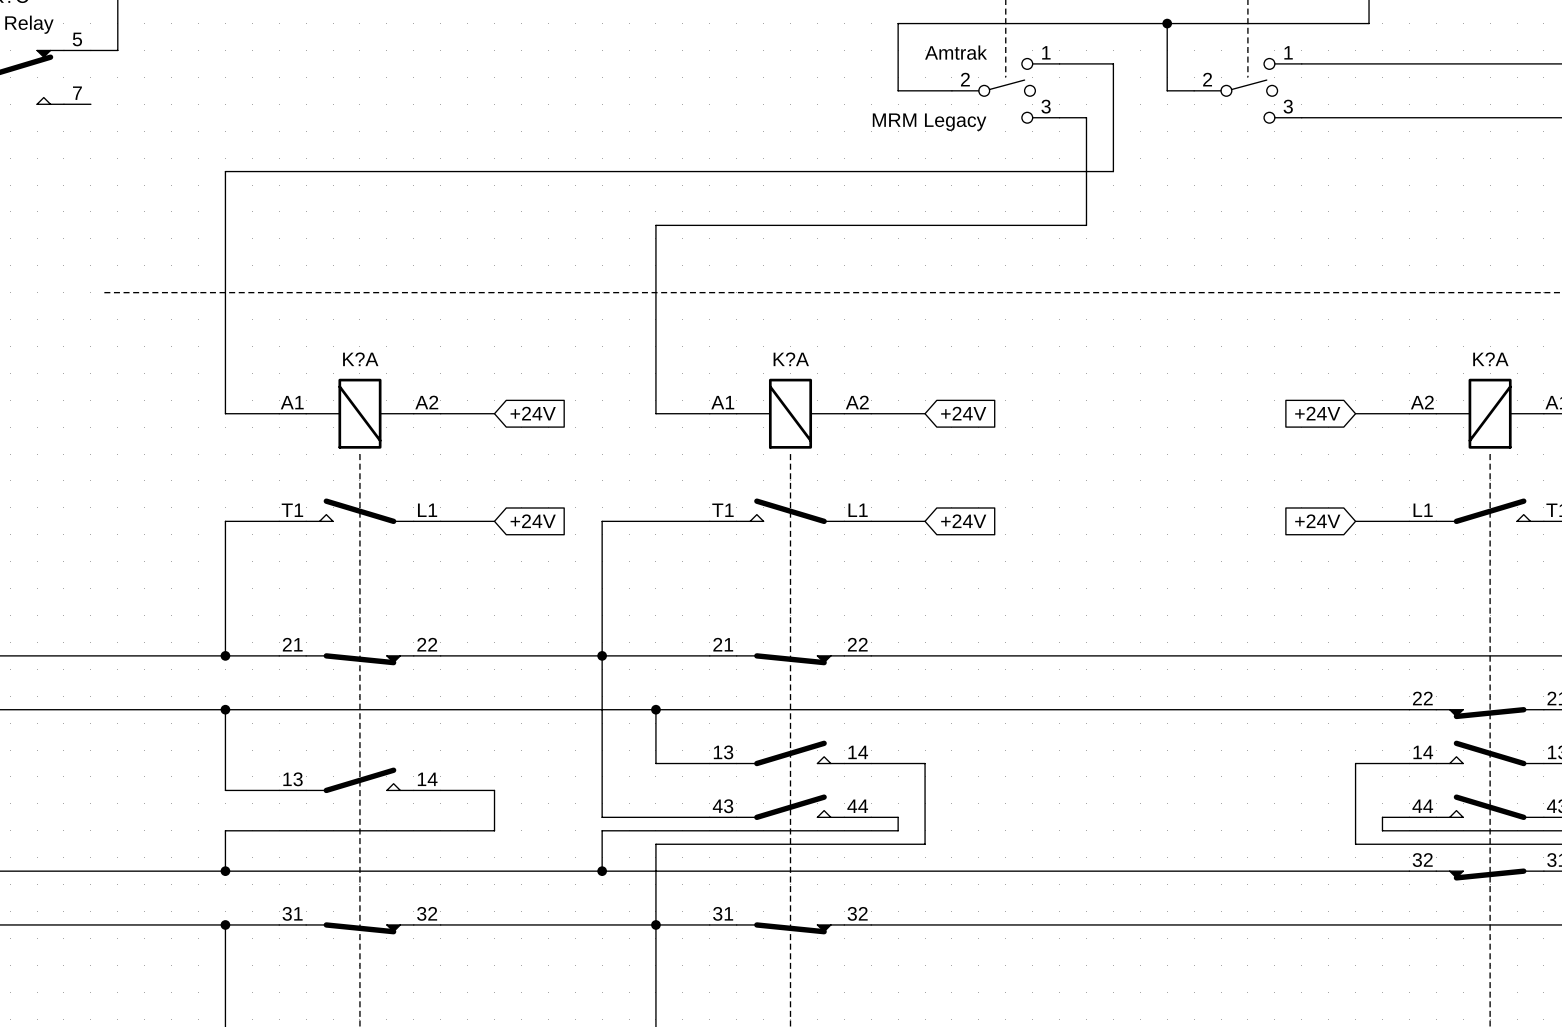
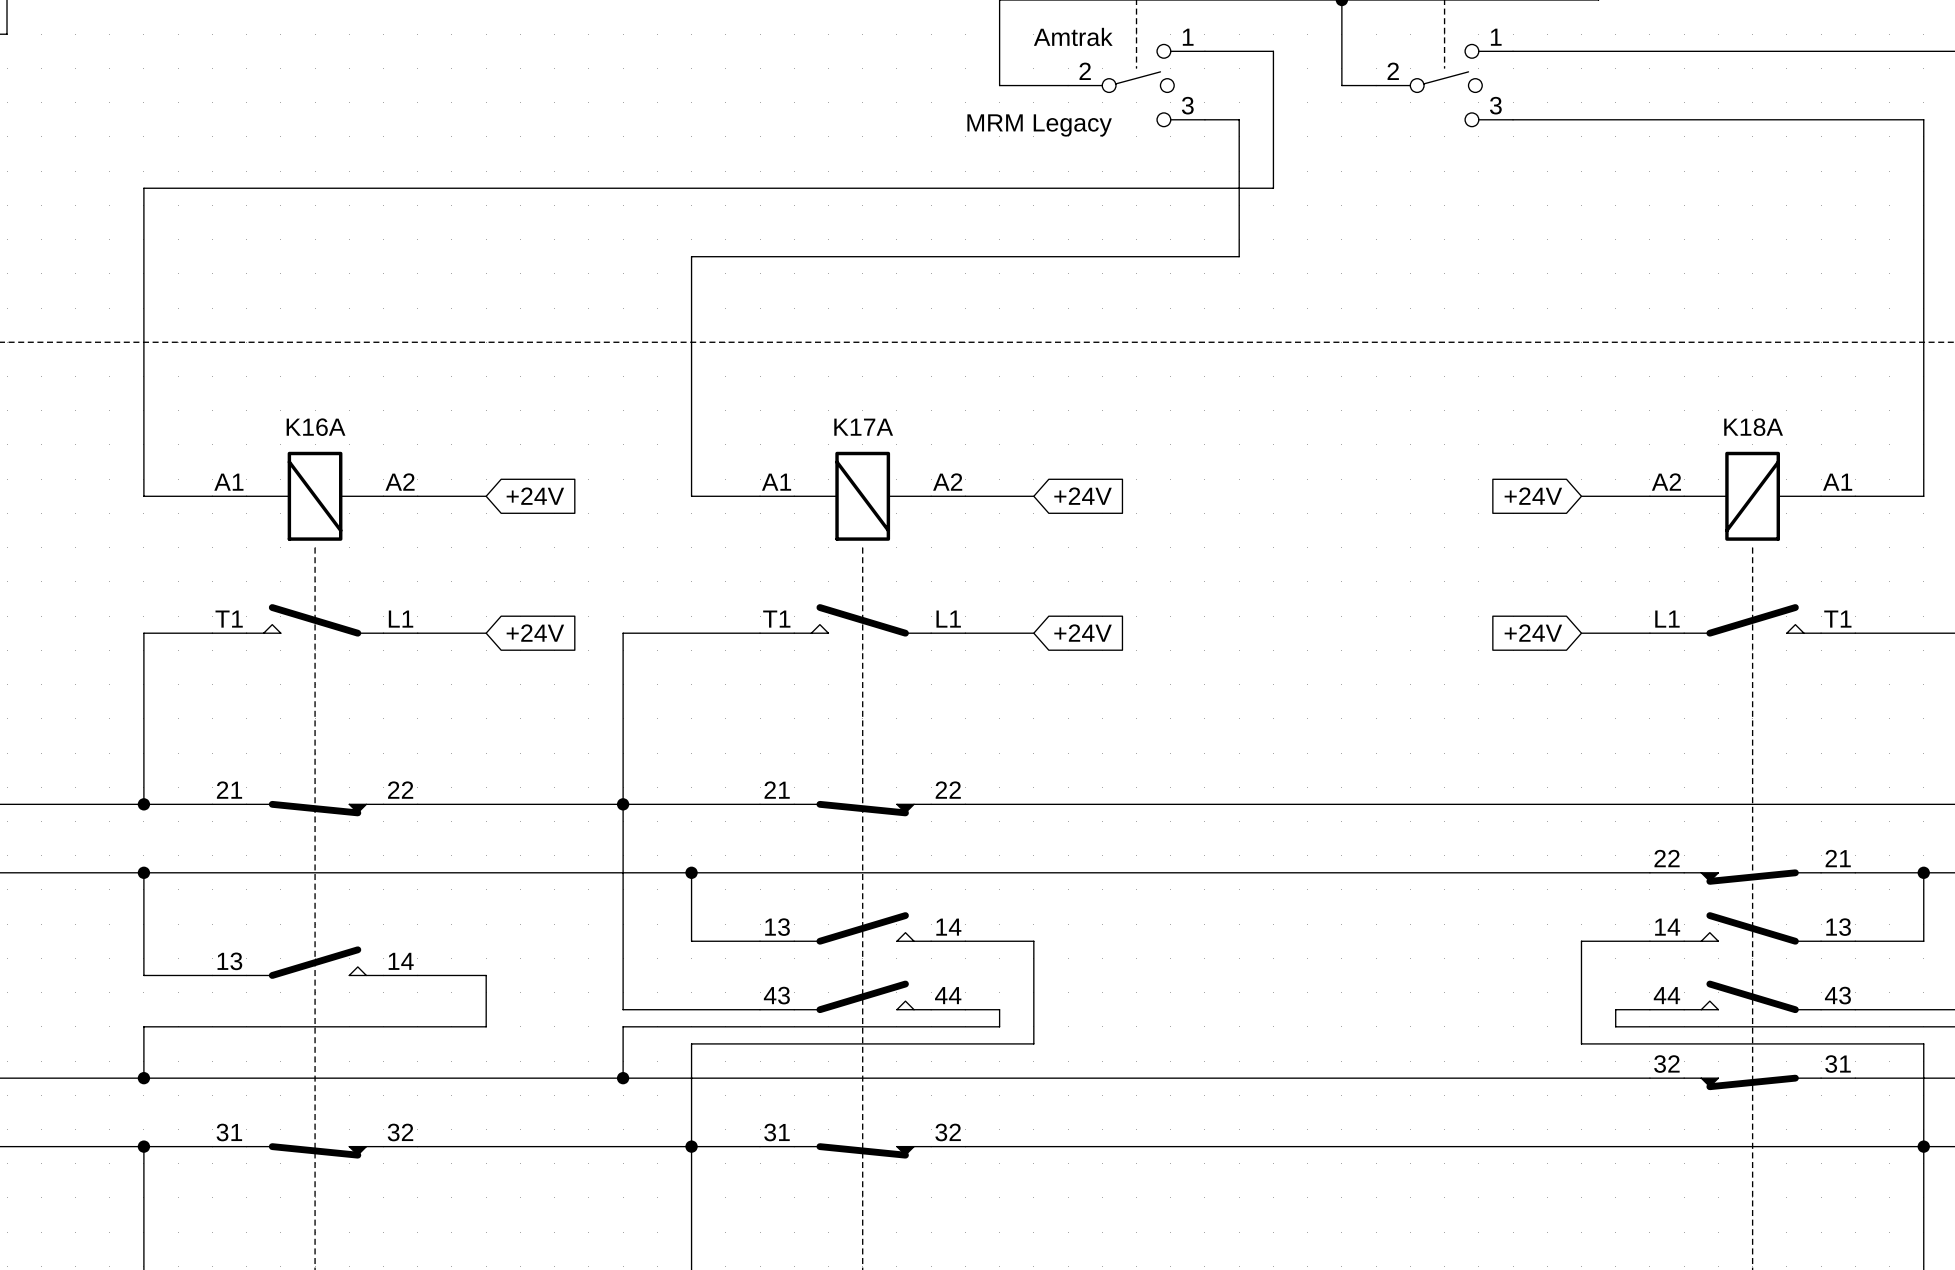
K?A name: K?A (360, 359) -> K16A (316, 427)
K?A name: K?A (791, 359) -> K17A (863, 427)
K?A name: K?A (1490, 359) -> K18A (1753, 427)

